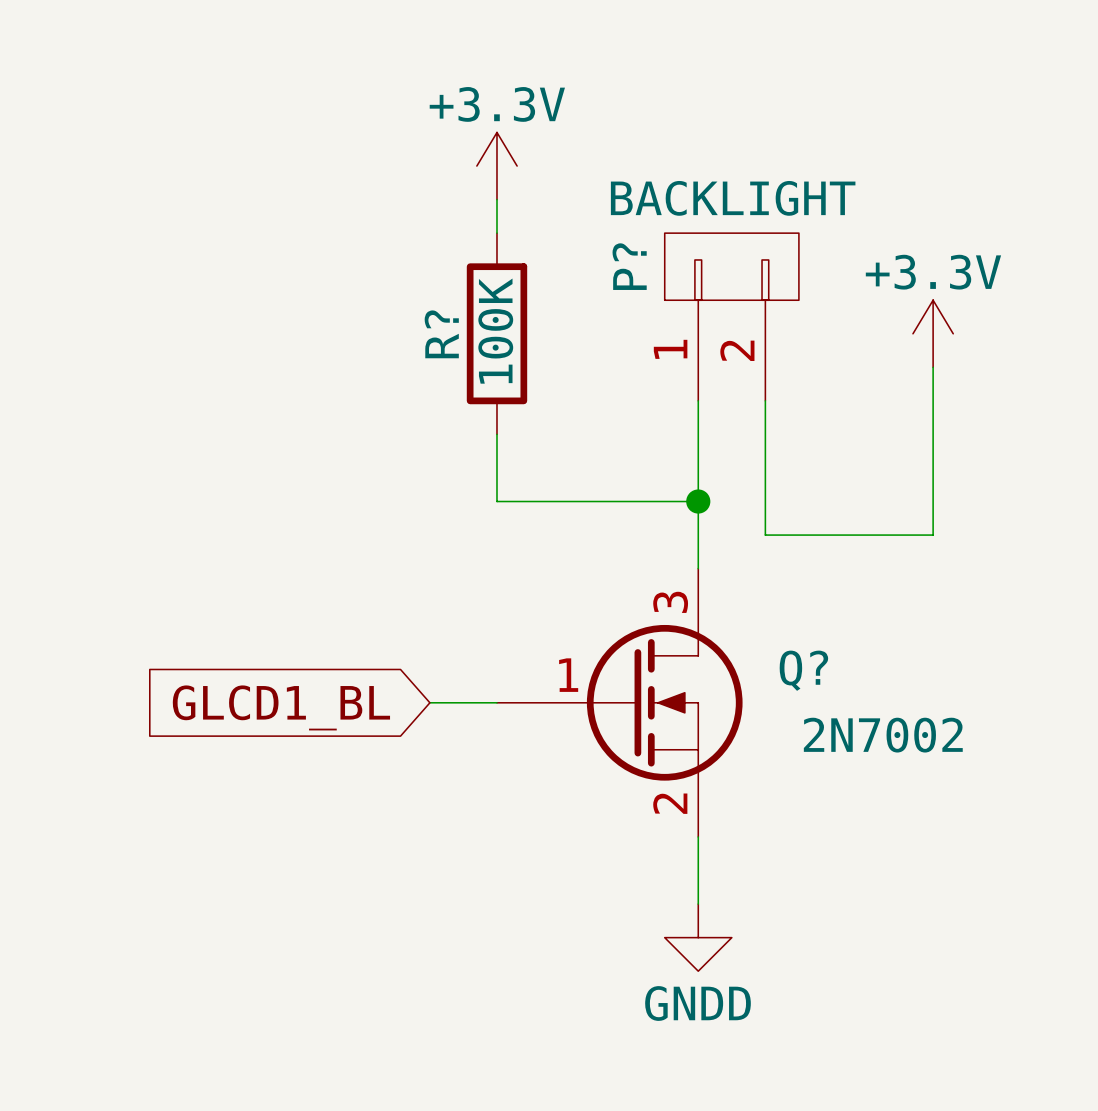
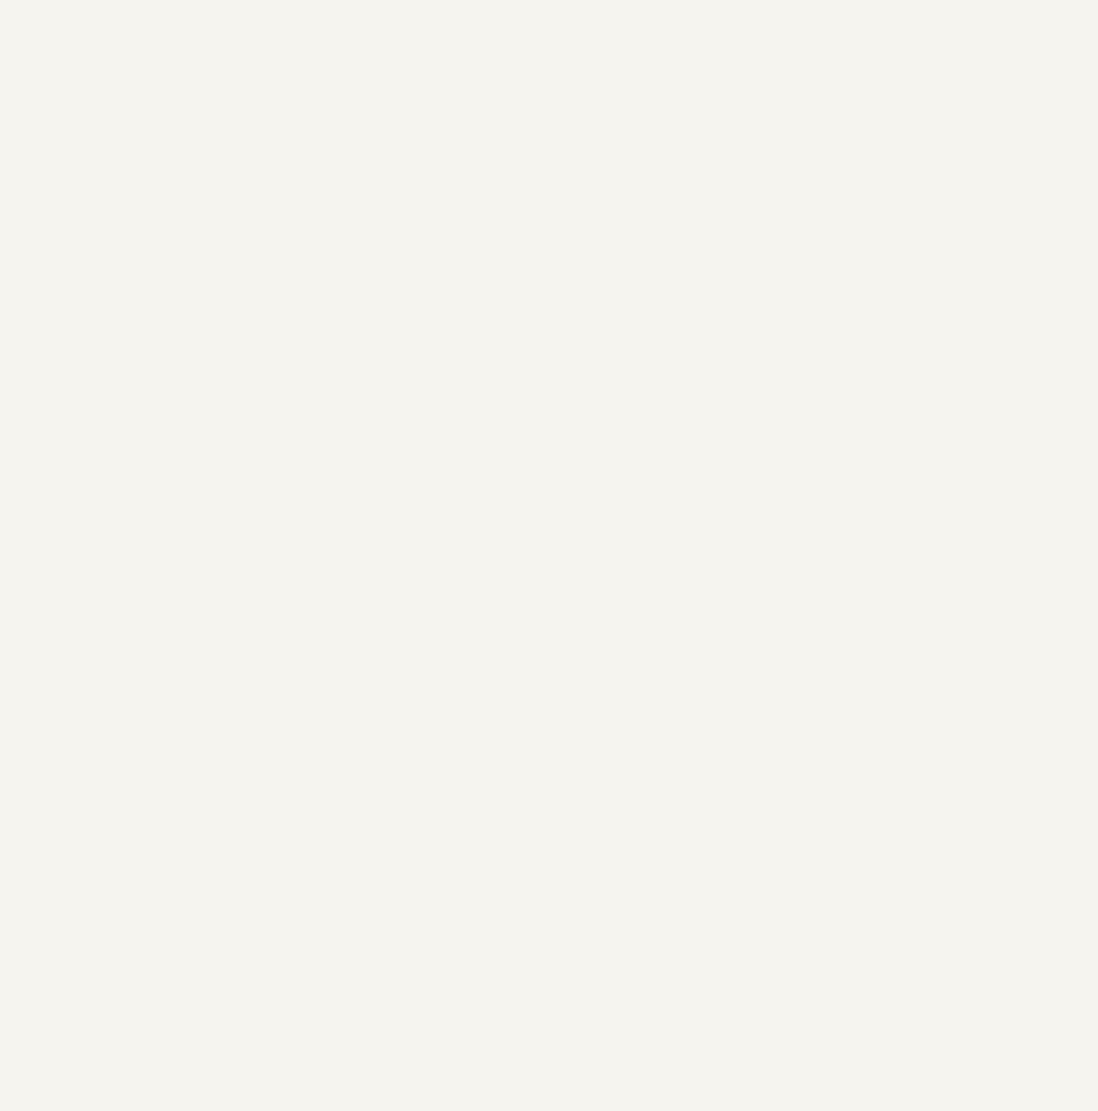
power symbol: +3.3V (496, 166) -> none
wire: (496, 199) (496, 233) -> none
P?: BACKLIGHT (731, 317) -> none
R?: 100K (496, 333) -> none
power symbol: +3.3V (933, 333) -> none
wire: (933, 367) (933, 535) (765, 535) (765, 400) -> none
wire: (698, 400) (698, 568) -> none
wire: (496, 434) (496, 501) (698, 501) -> none
junction: (698, 501) -> none
wire: (429, 702) (496, 702) -> none
Q?: 2N7002 (619, 702) -> none
global label: GLCD1_BL (281, 707) -> none
wire: (698, 836) (698, 904) -> none
power symbol: GNDD (698, 937) -> none

